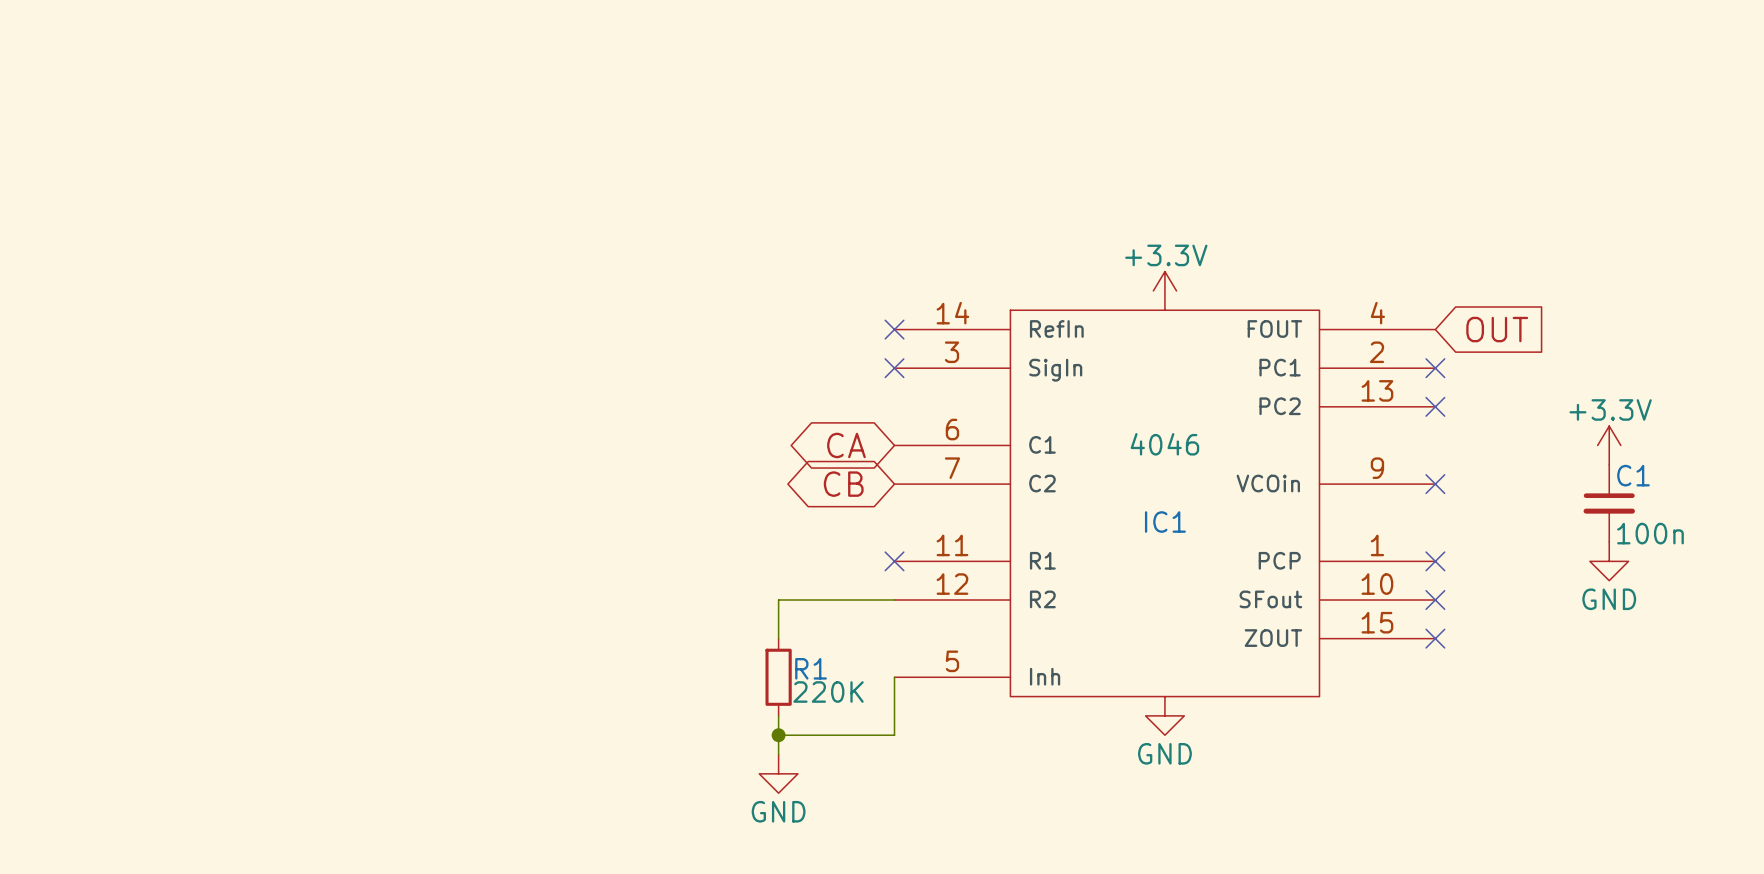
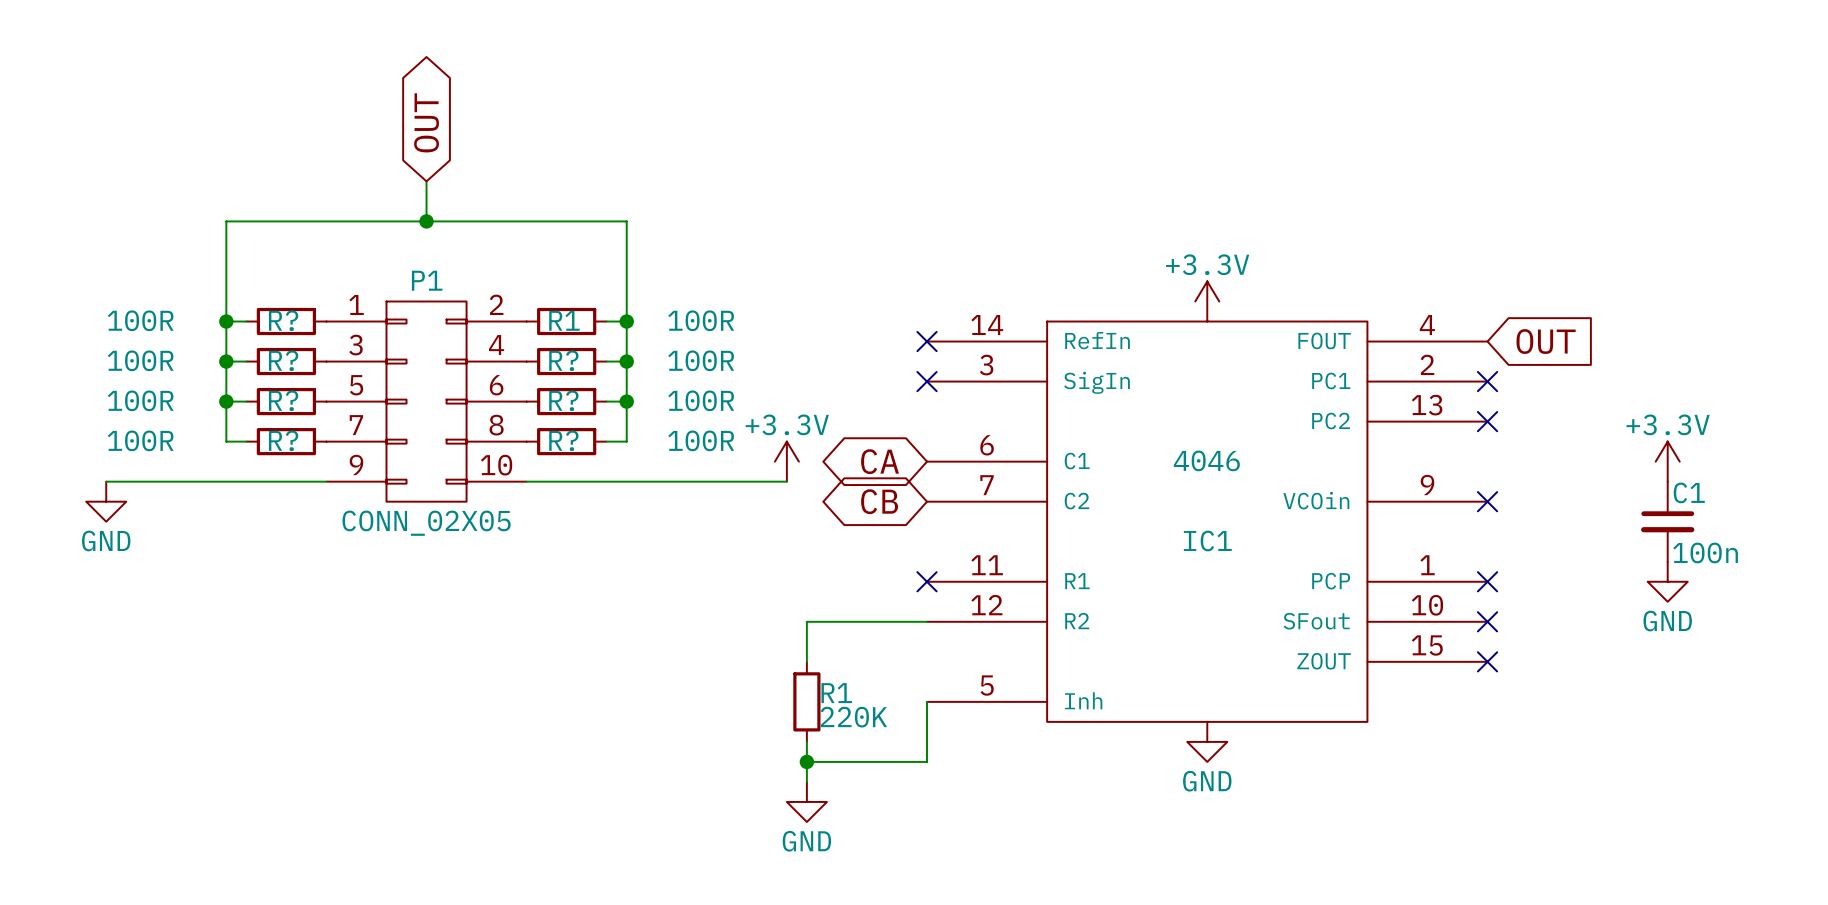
global label: none -> OUT (426, 122)
wire: none -> (426, 181) (426, 221)
junction: none -> (426, 221)
wire: none -> (226, 321) (246, 321)
junction: none -> (226, 321)
R?: none -> 100R (286, 321)
R1: none -> 100R (566, 321)
wire: none -> (606, 321) (626, 321)
junction: none -> (626, 321)
wire: none -> (226, 361) (246, 361)
junction: none -> (226, 361)
R?: none -> 100R (286, 361)
R?: none -> 100R (566, 361)
wire: none -> (606, 361) (626, 361)
junction: none -> (626, 361)
wire: none -> (226, 401) (246, 401)
junction: none -> (226, 401)
R?: none -> 100R (286, 401)
P1: none -> CONN_02X05 (426, 401)
R?: none -> 100R (566, 401)
wire: none -> (606, 401) (626, 401)
junction: none -> (626, 401)
wire: none -> (246, 441) (226, 441) (226, 221) (626, 221) (626, 441) (606, 441)
R?: none -> 100R (286, 441)
R?: none -> 100R (566, 441)
power symbol: none -> +3.3V (786, 461)
wire: none -> (106, 481) (326, 481)
wire: none -> (526, 481) (786, 481)
power symbol: none -> GND (106, 501)

